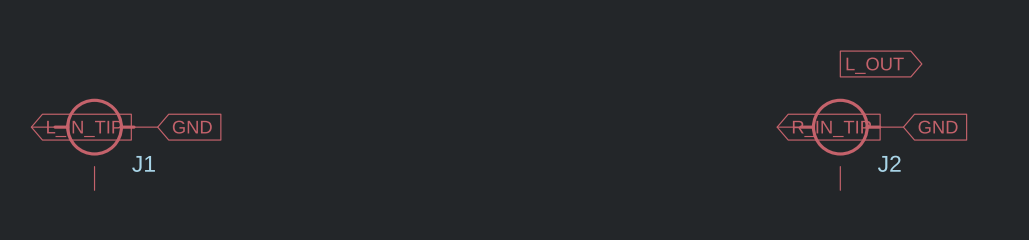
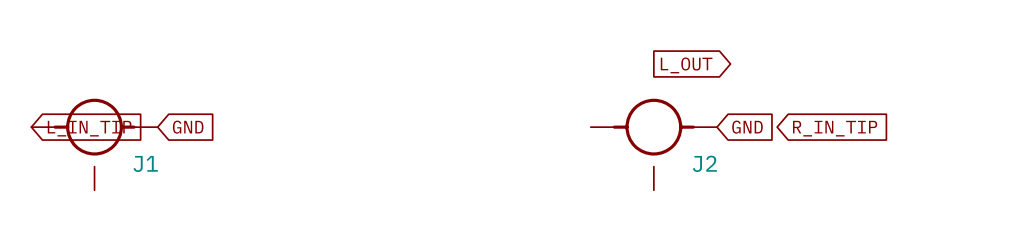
global label position: L_OUT (875, 65) -> L_OUT (686, 65)
global label position: GND (938, 127) -> GND (747, 127)
J2 position: (840, 144) -> (653, 144)

